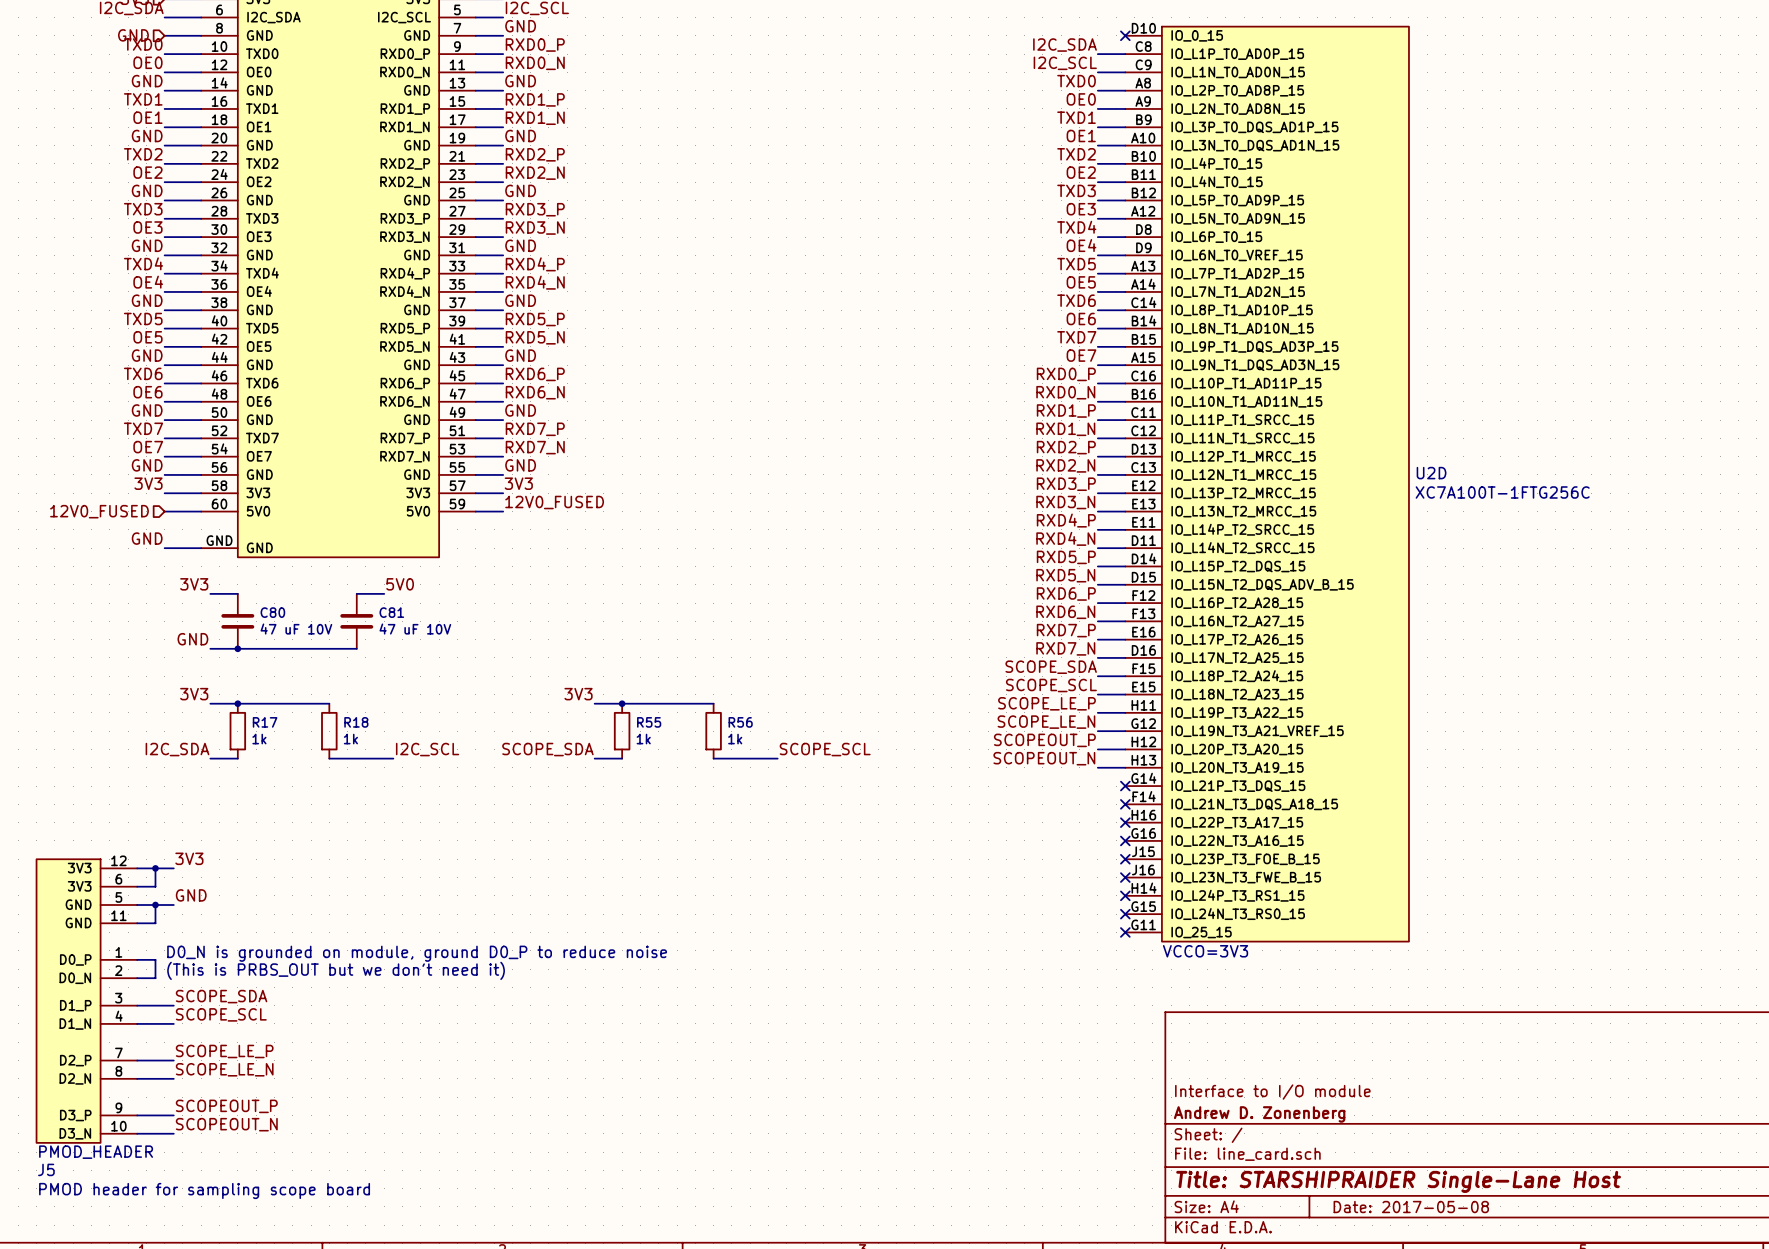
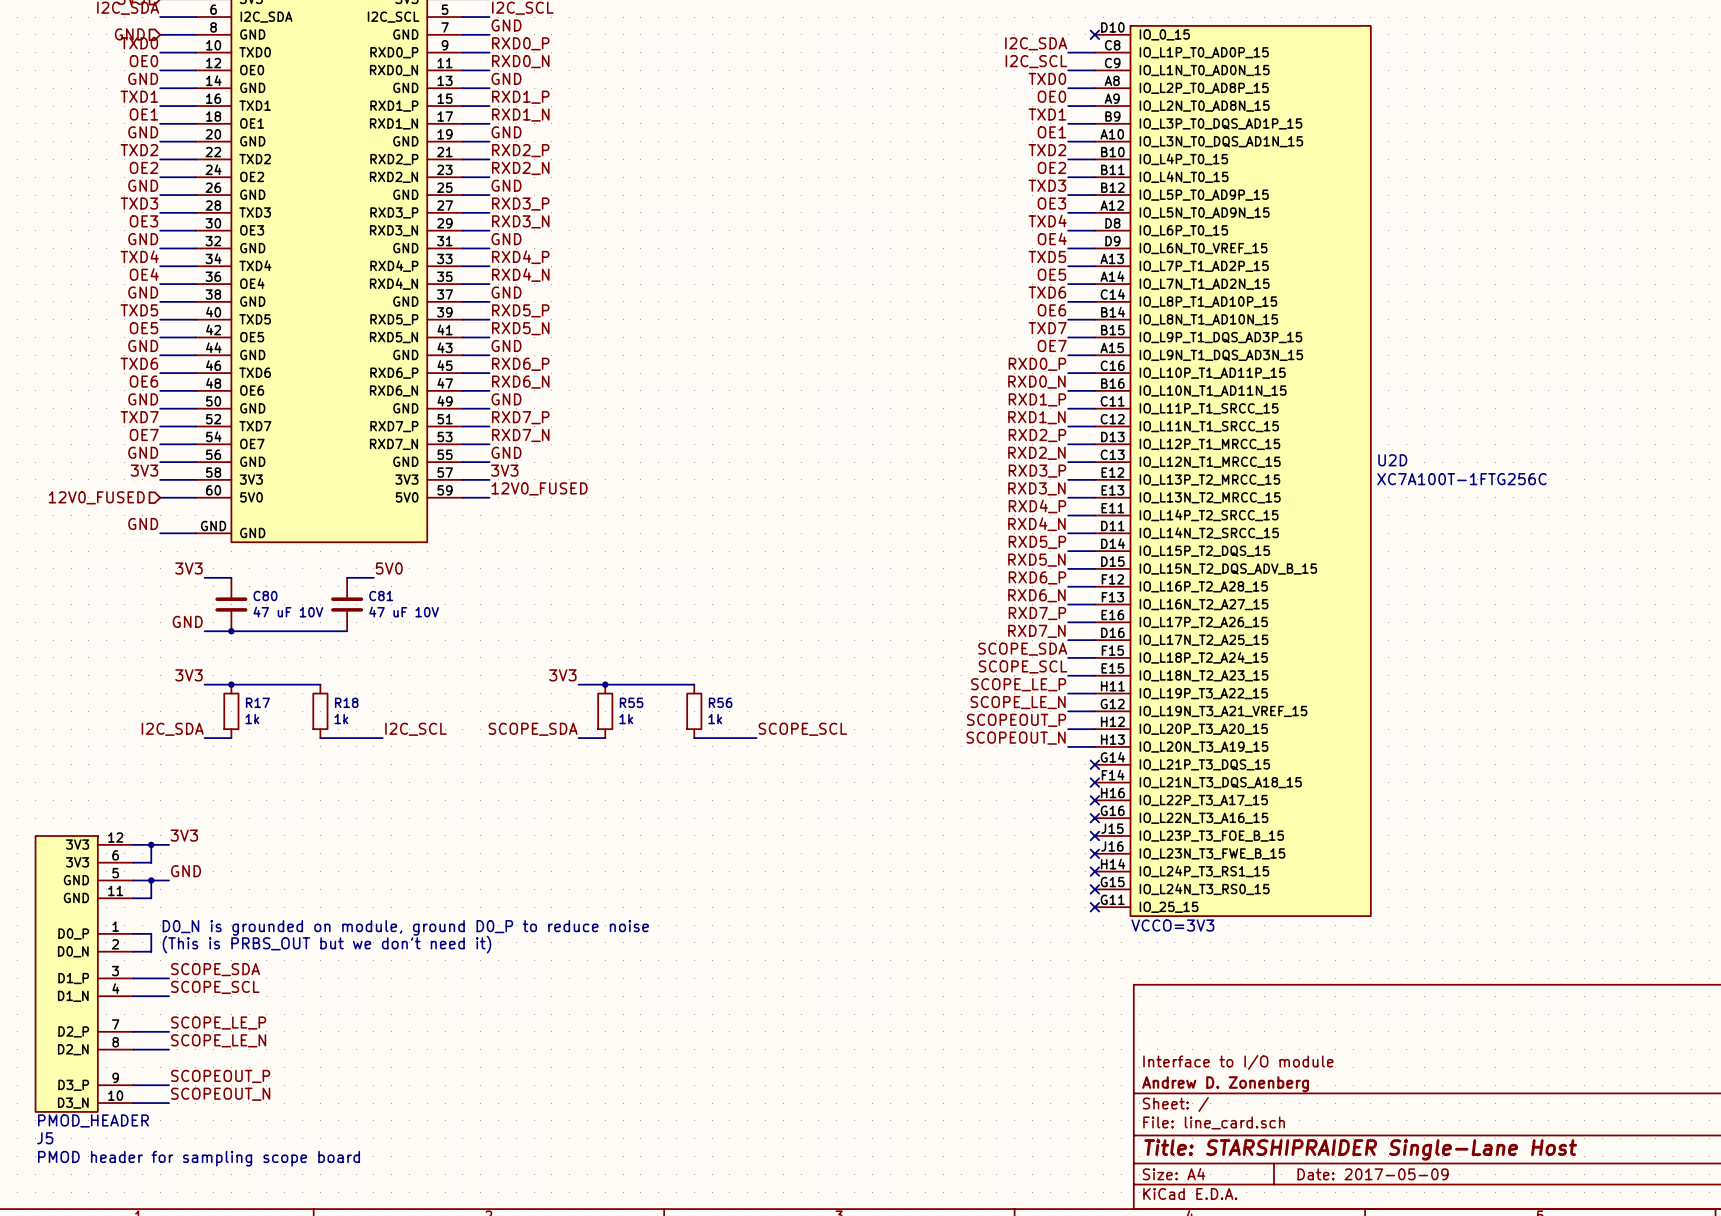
title block: Date: 2017-05-08 (1411, 1207) -> Date: 2017-05-09 (1373, 1174)

